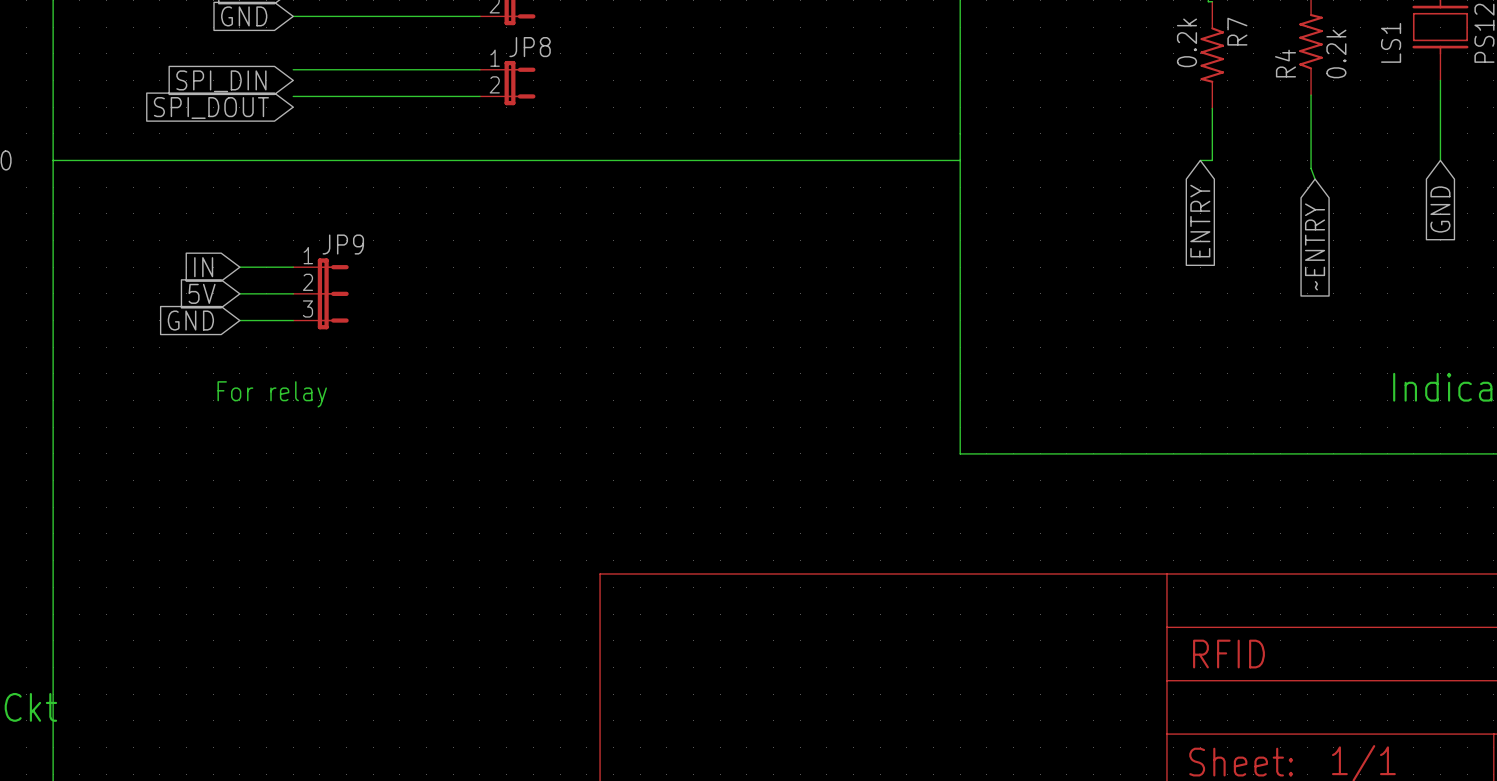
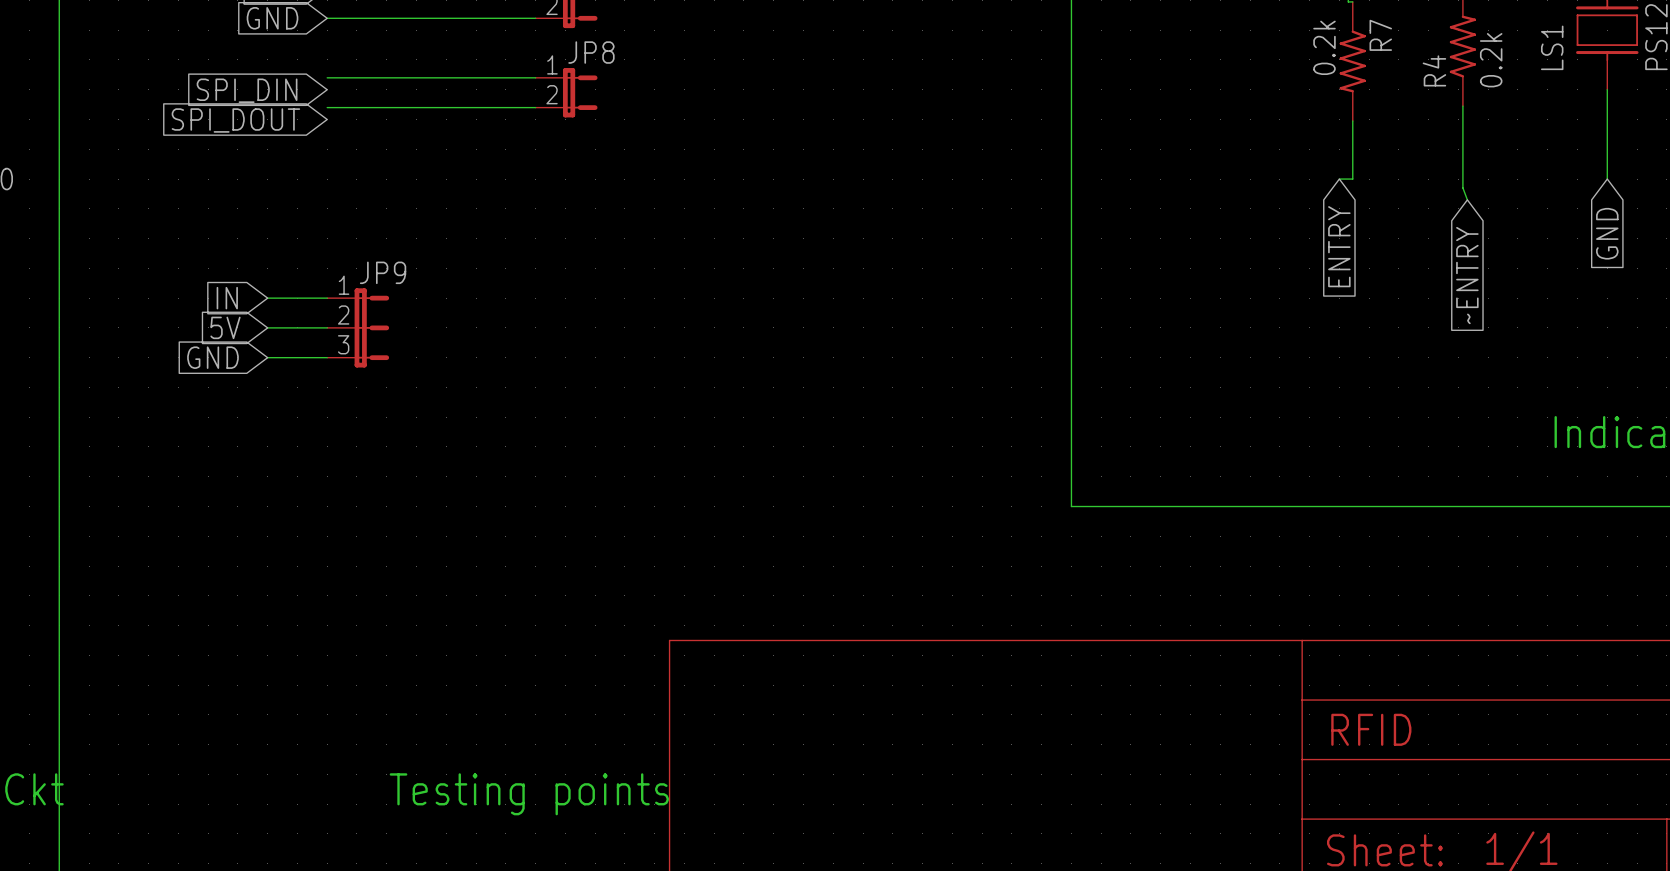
wire: (53, 160) (960, 160) -> none
text: For relay (272, 394) -> none
text: none -> Testing points (529, 794)

